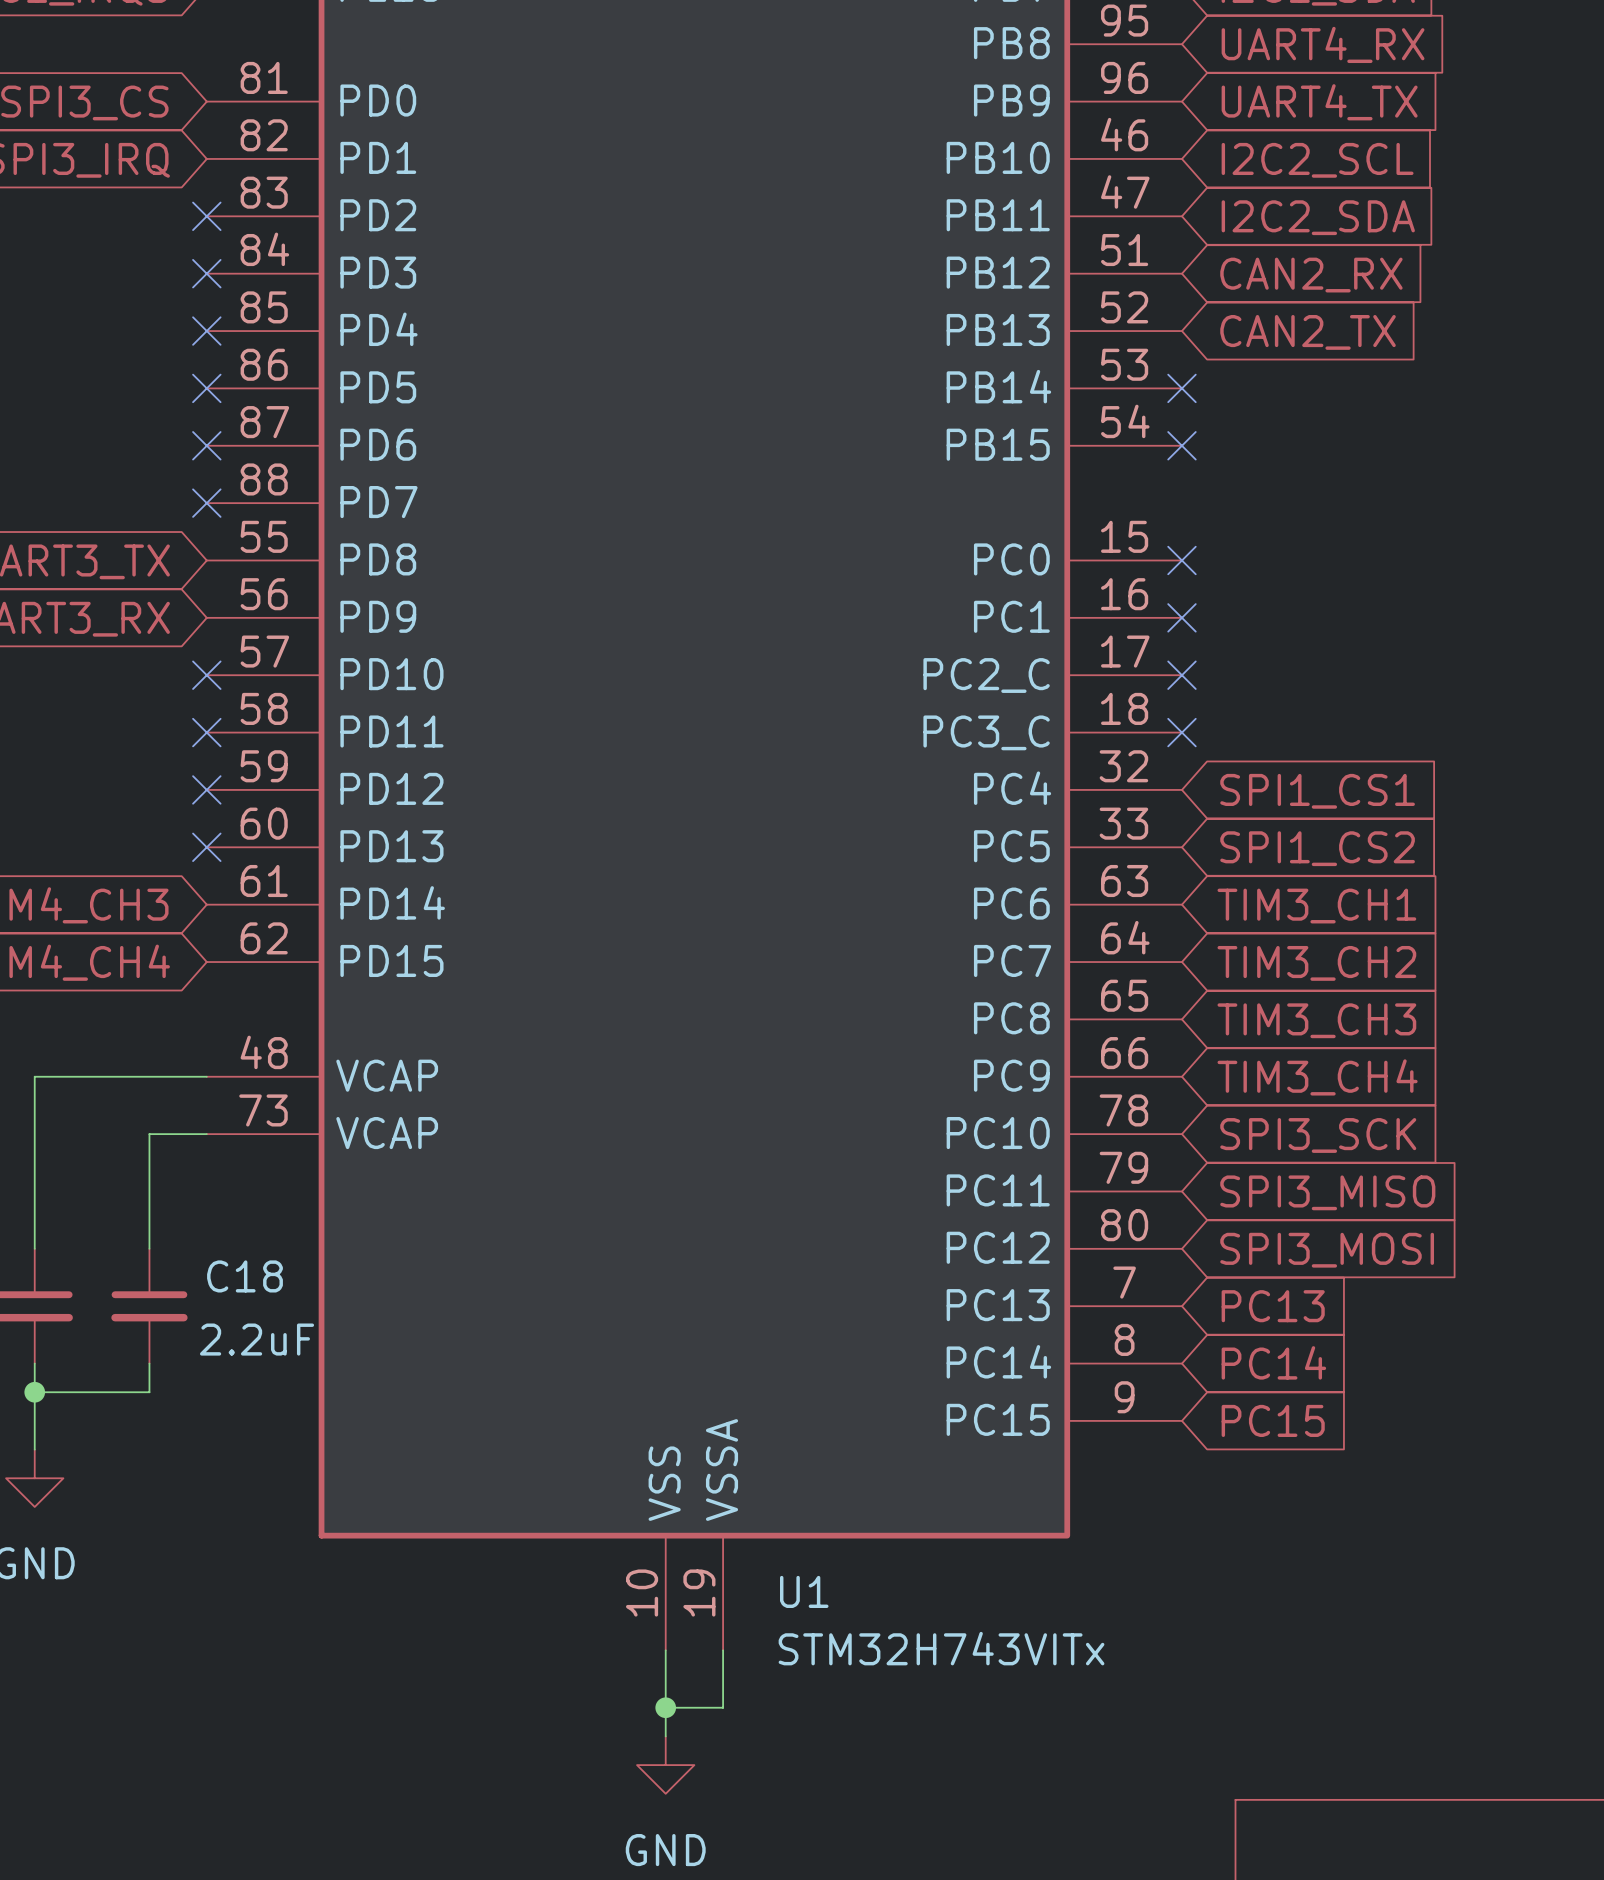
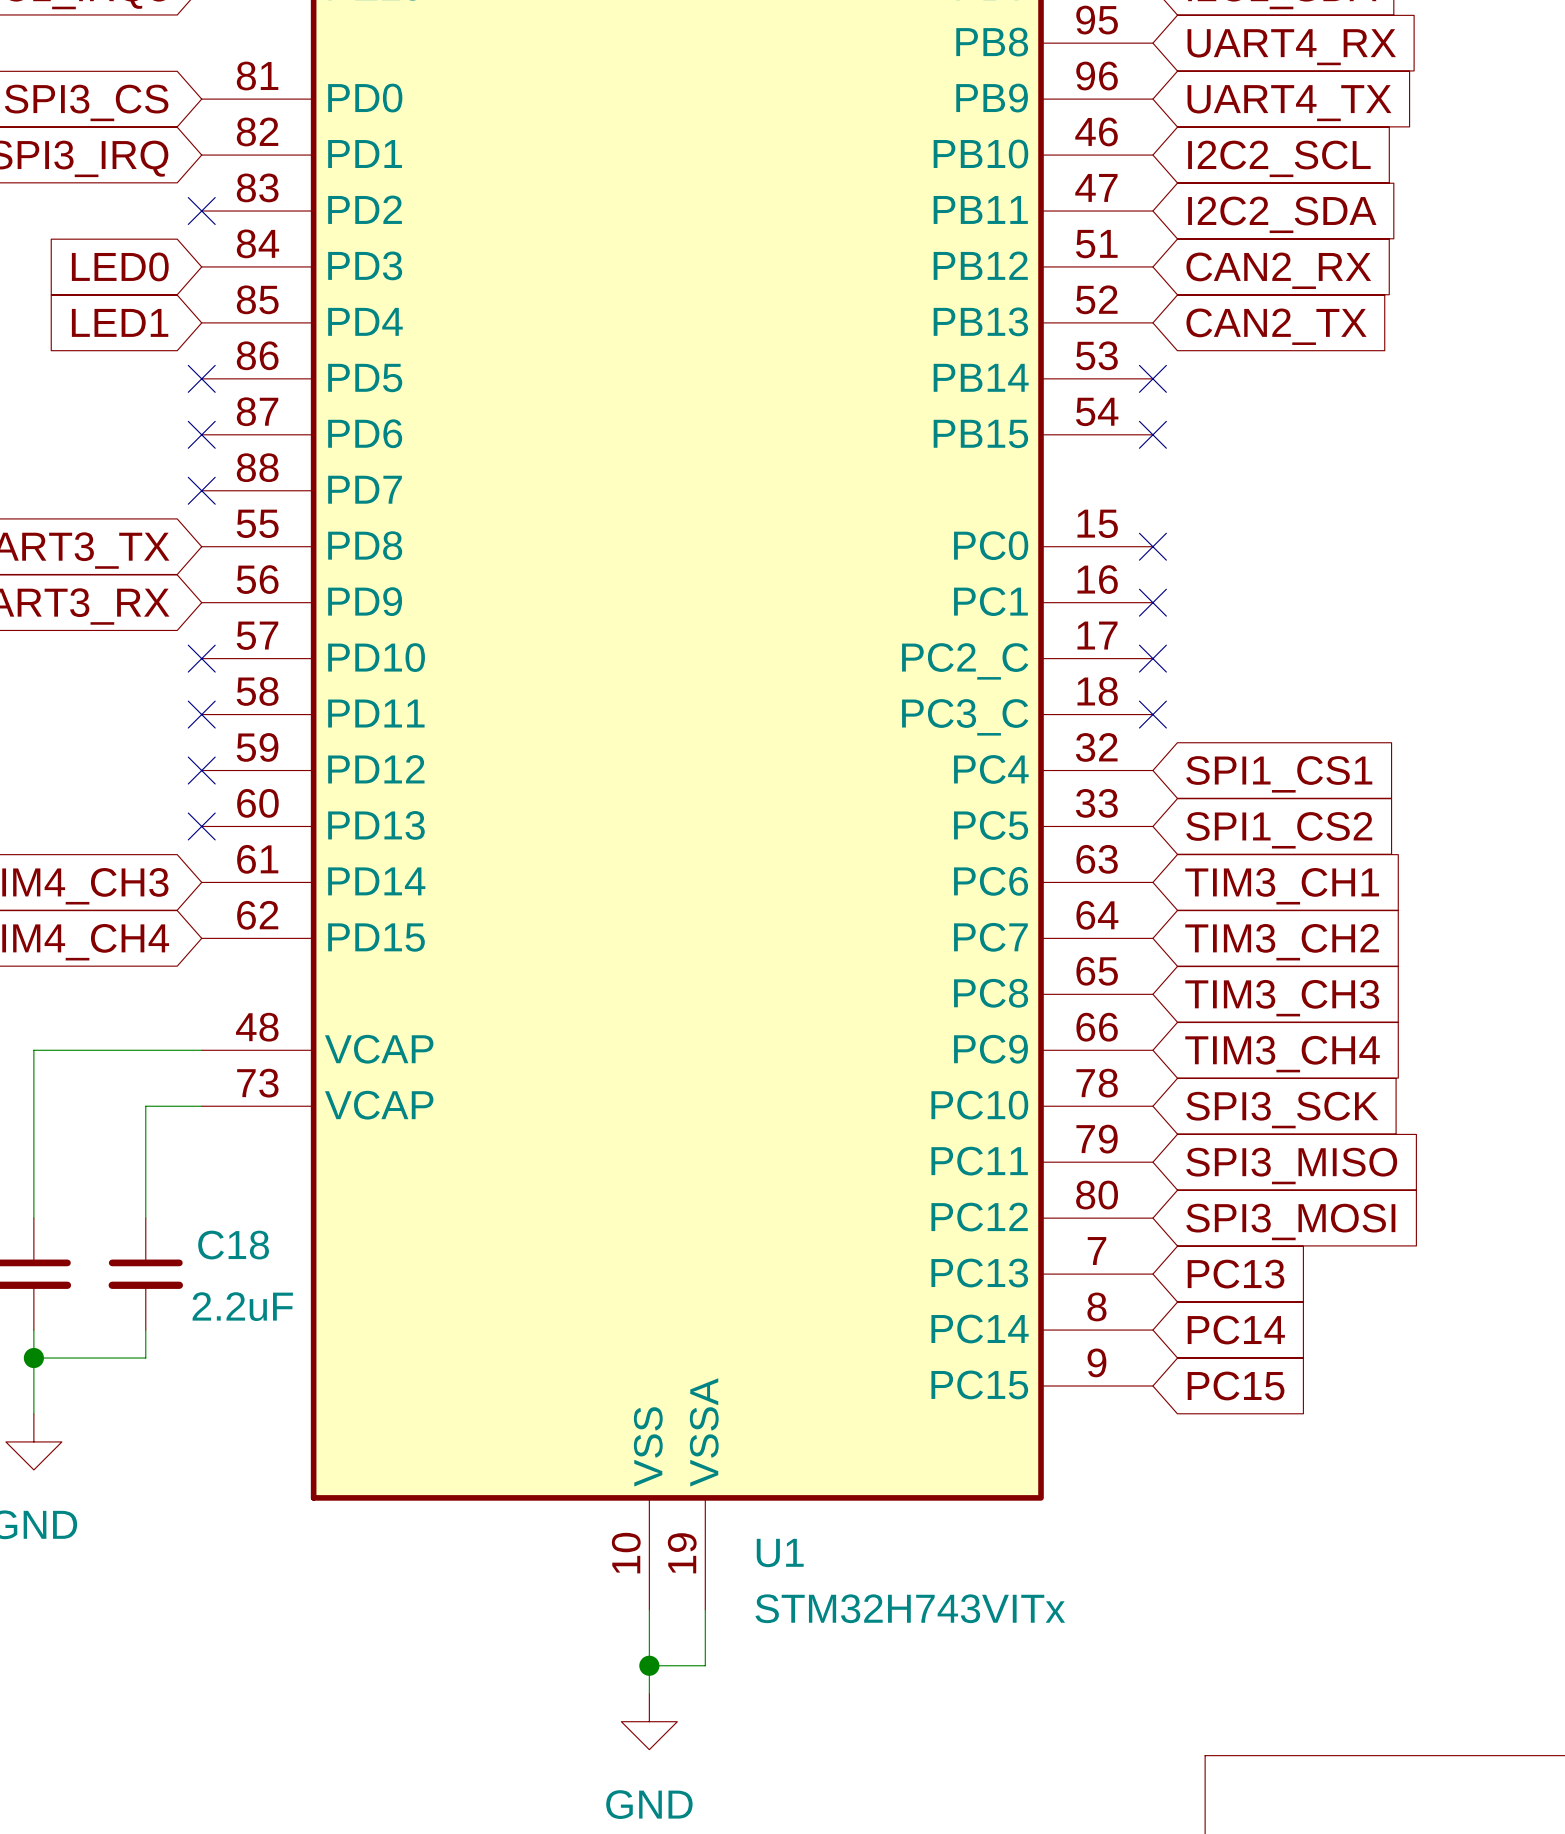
global label: none -> LED0 (120, 266)
no-connect mark: (206, 273) -> none
global label: none -> LED1 (120, 322)
no-connect mark: (206, 331) -> none

